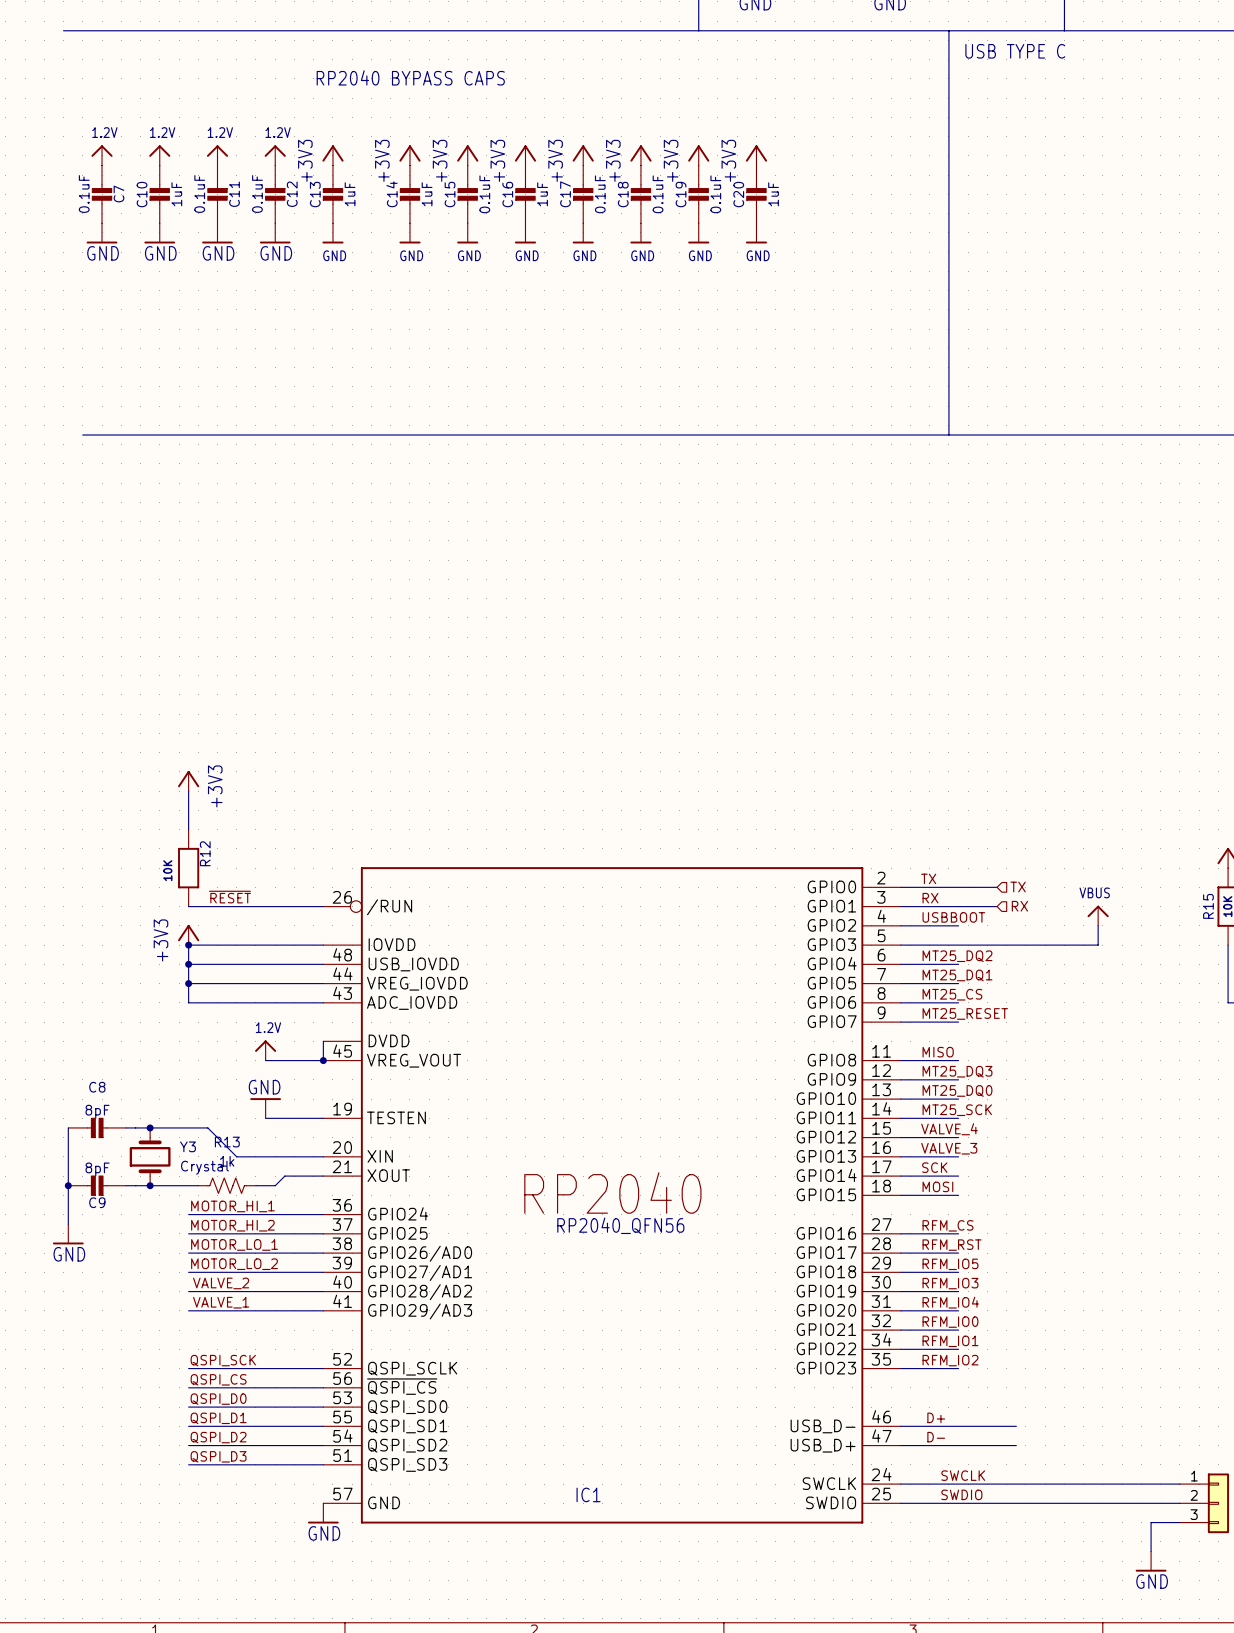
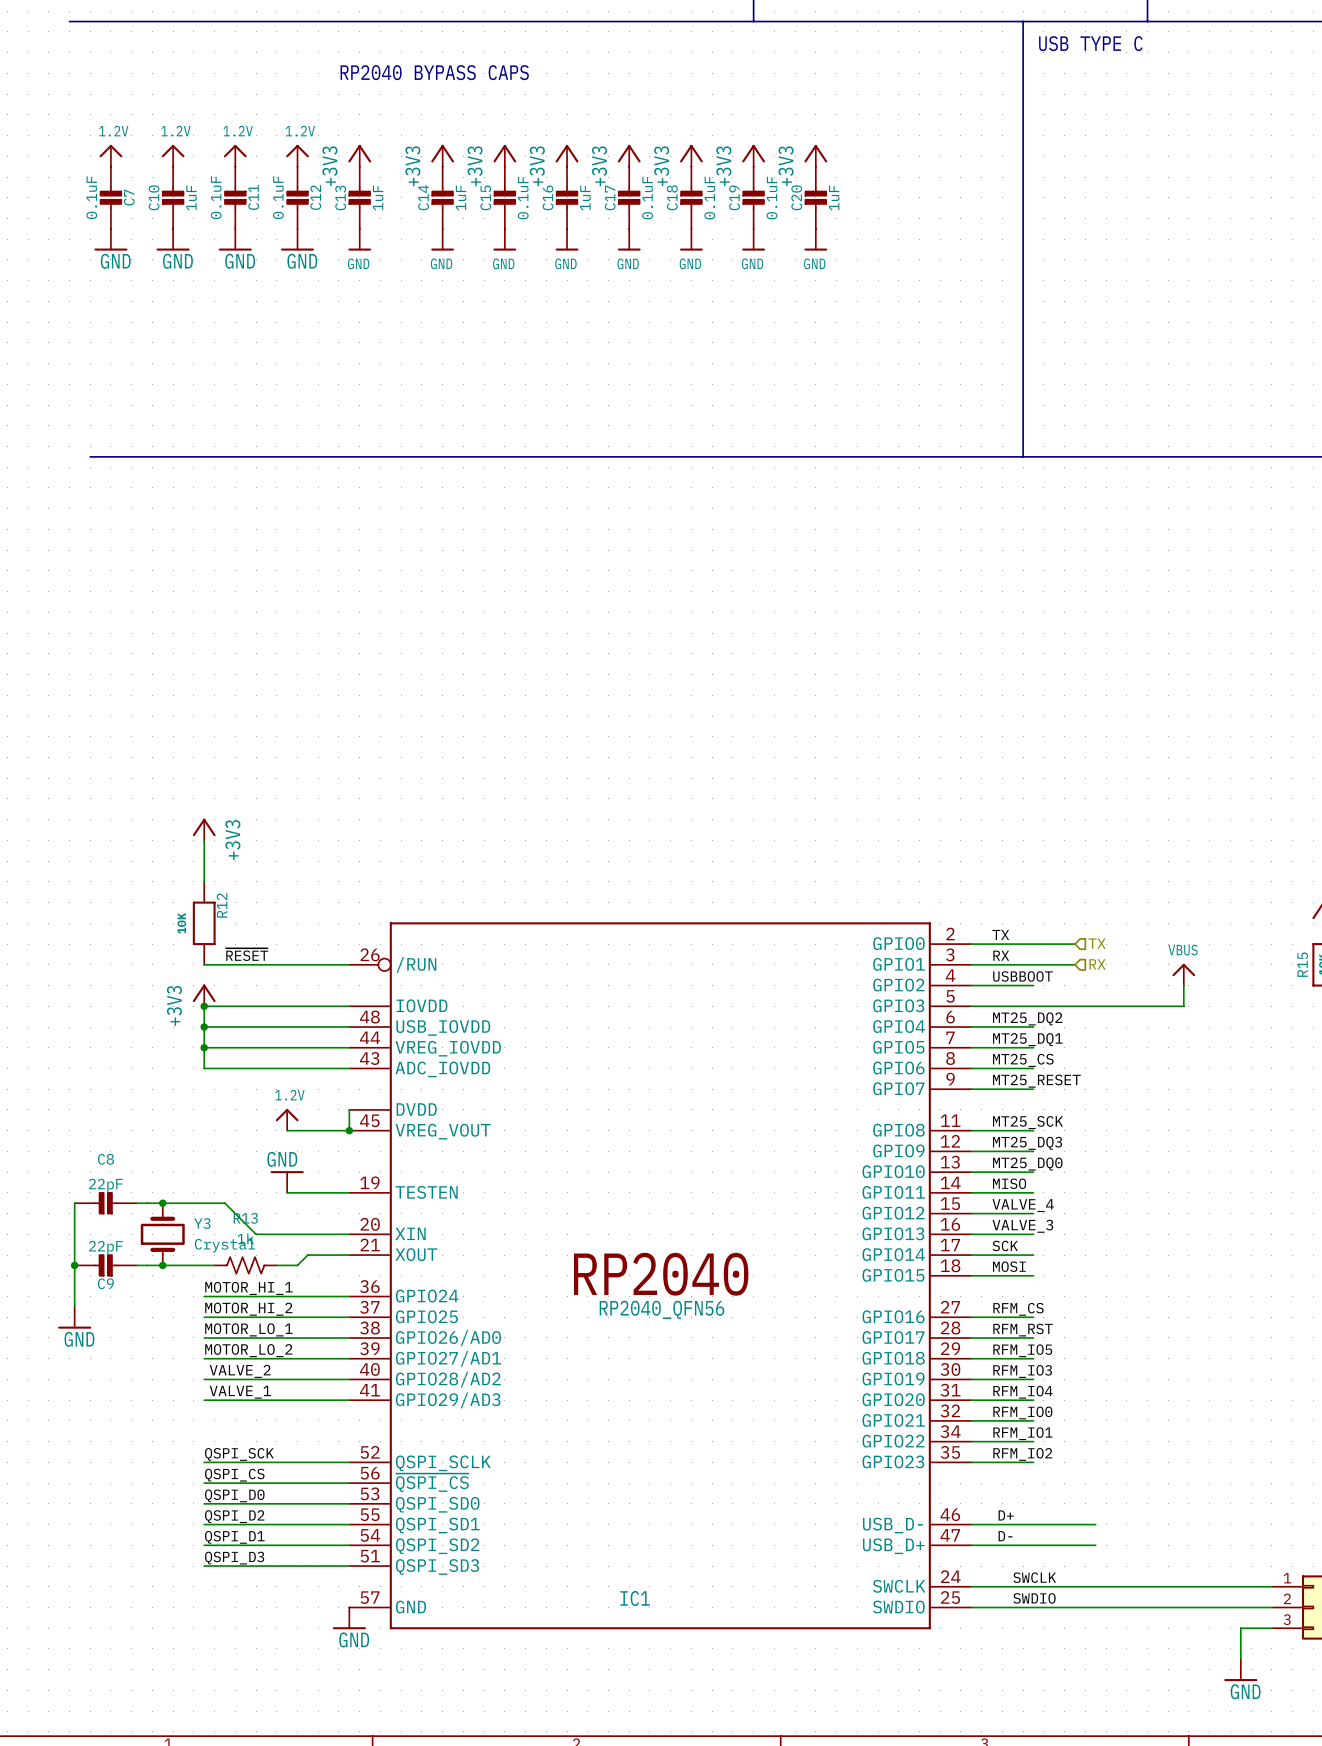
label: MISO (938, 1052) -> MT25_SCK (1028, 1122)
label: MT25_SCK (957, 1110) -> MISO (1009, 1183)
C8 value: 8pF (97, 1111) -> 22pF (105, 1185)
C9 value: 8pF (97, 1169) -> 22pF (105, 1247)
label: QSPI_D1 (218, 1418) -> QSPI_D2 (234, 1516)
label: QSPI_D2 (218, 1437) -> QSPI_D1 (234, 1537)

